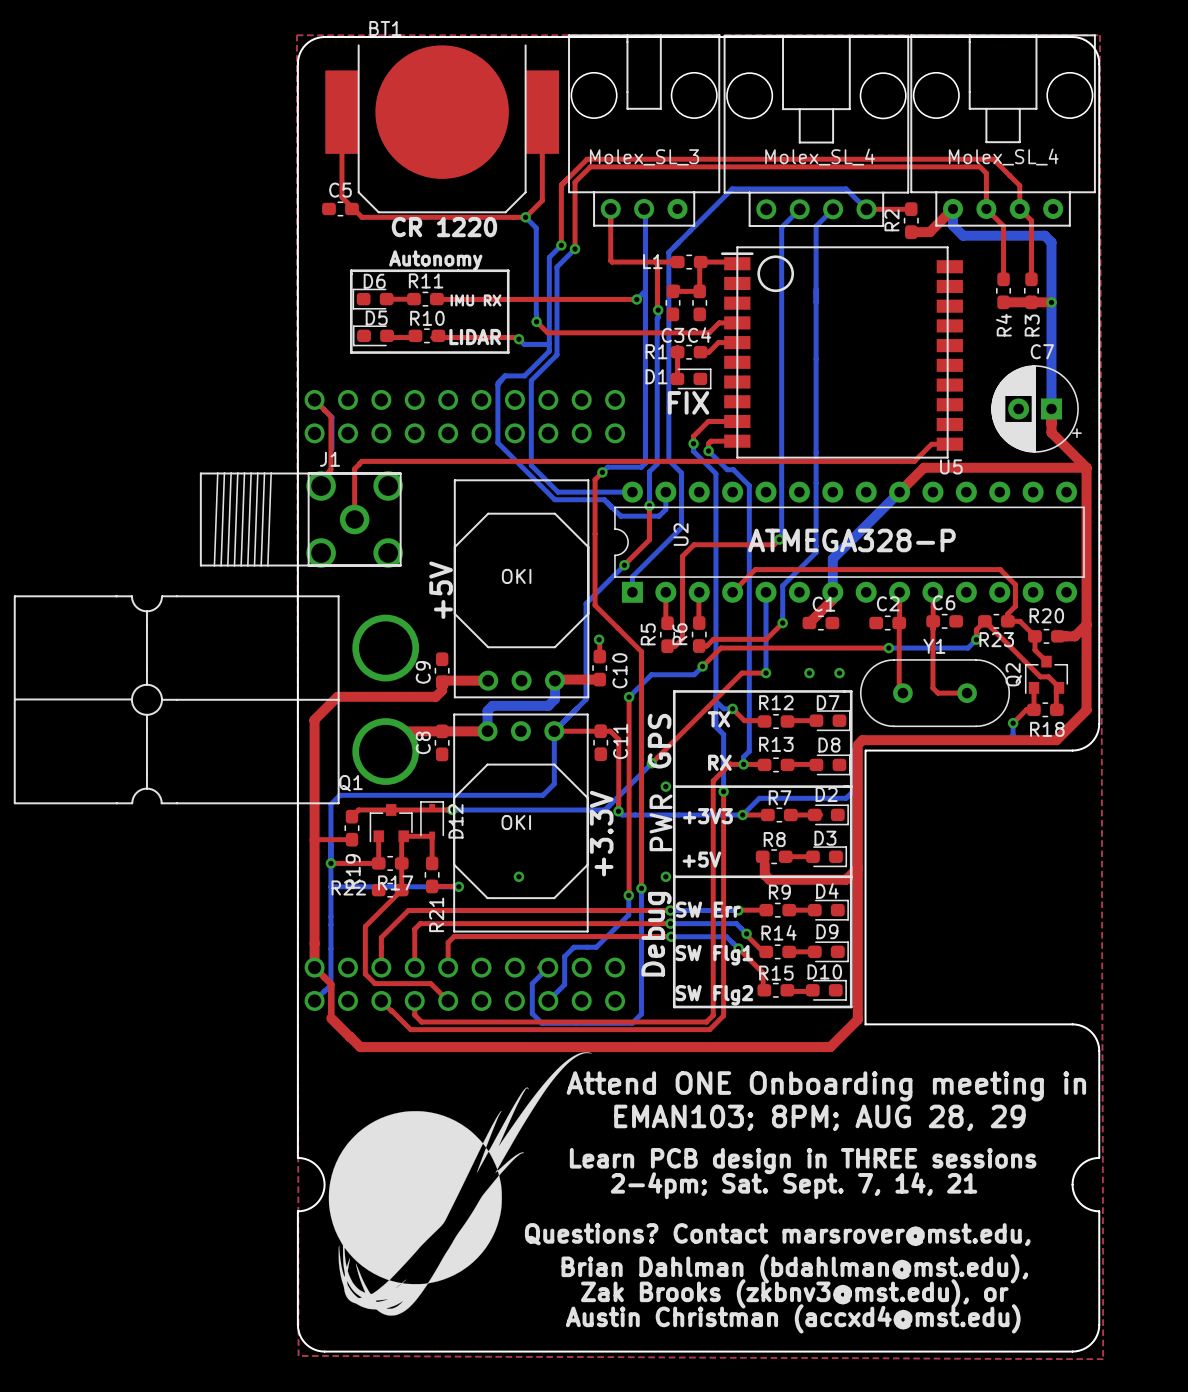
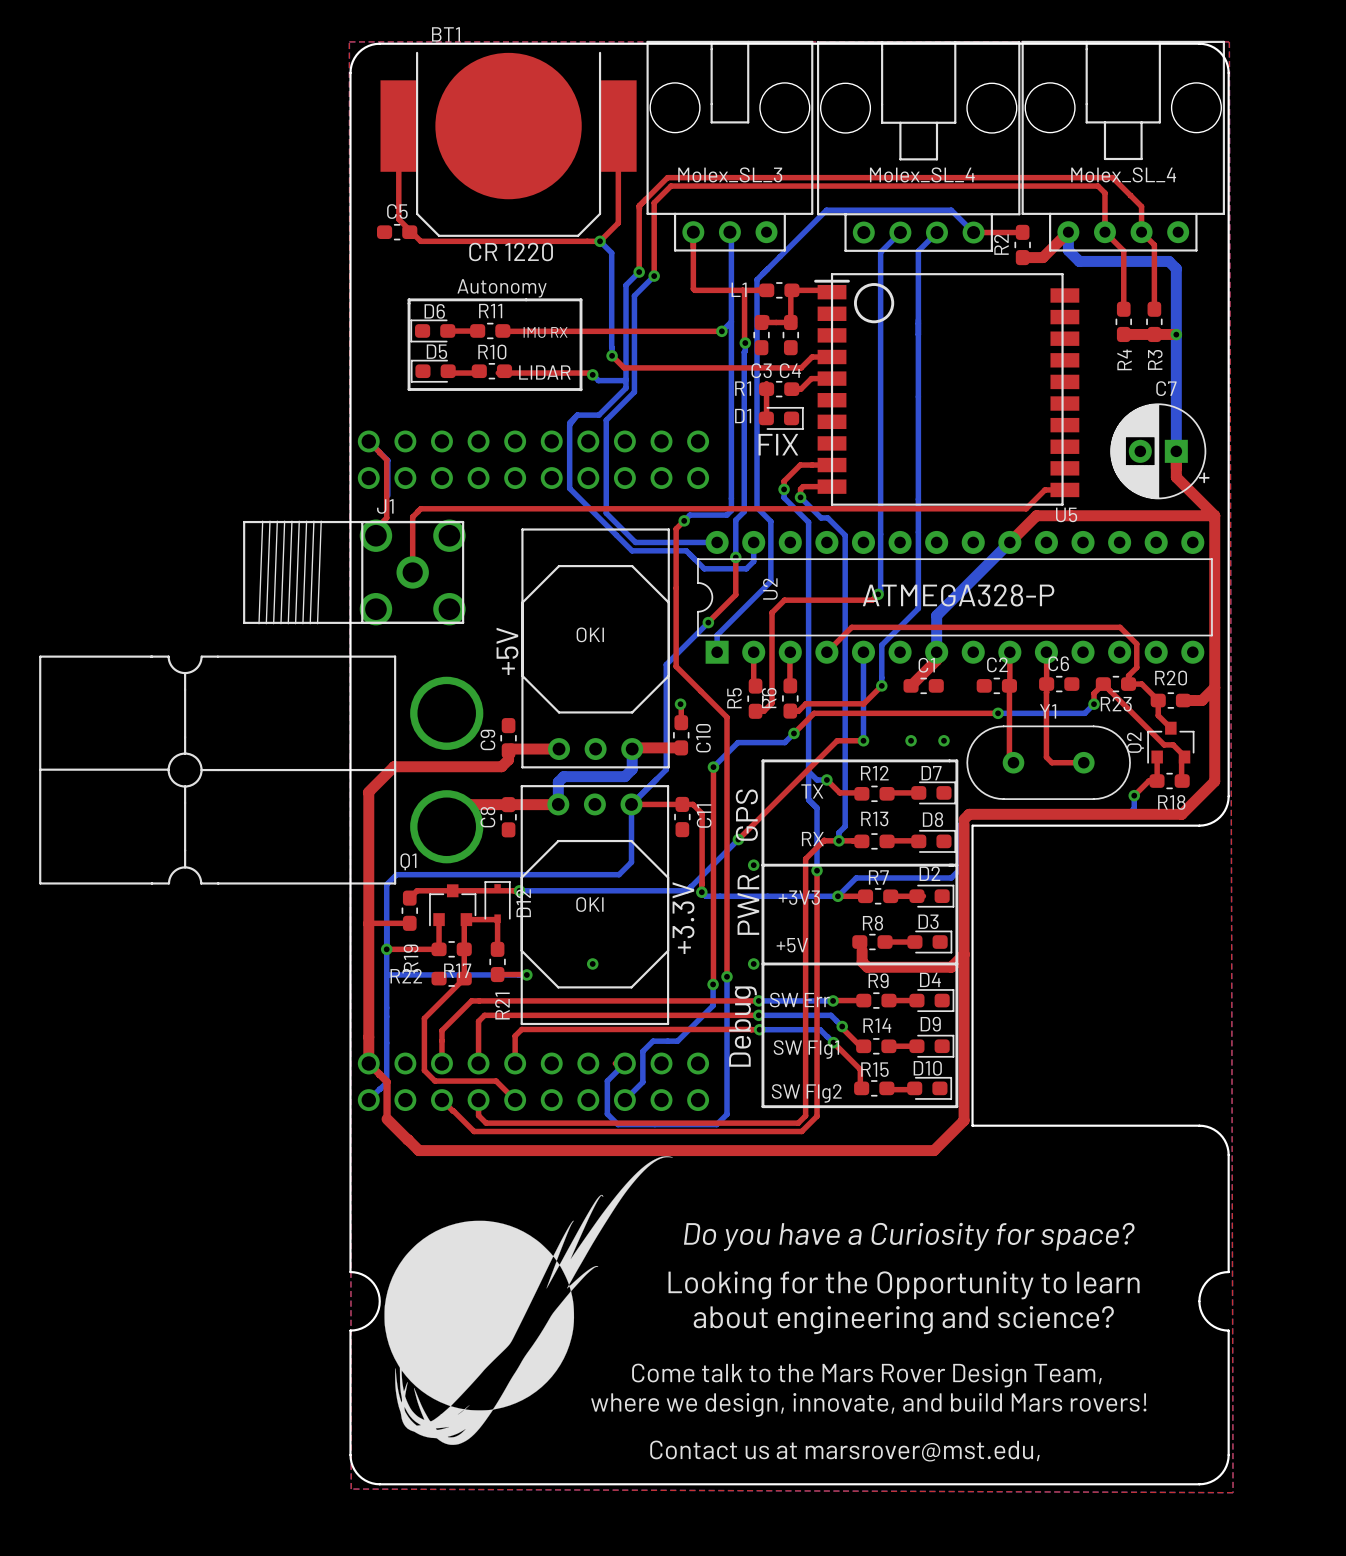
text: Attend ONE Onboarding meeting in (826, 1086) -> none
text: EMAN103; 8PM; AUG 28, 29 (819, 1117) -> none
text: none -> Do you have a Curiosity for space? (909, 1236)
text: Learn PCB design in THREE sessions (803, 1161) -> none
text: none -> Looking for the Opportunity to learn (904, 1285)
text: 2-4pm; Sat. Sept. 7, 14, 21 (794, 1185) -> none
text: none -> about engineering and science? (903, 1320)
text: Questions? Contact marsrover@mst.edu, (777, 1234) -> none
text: none -> Come talk to the Mars Rover Design Team, (866, 1375)
text: Brian Dahlman (bdahlman@mst.edu), (794, 1268) -> none
text: none -> where we design, innovate, and build Mars rovers! (868, 1404)
text: Zak Brooks (zkbnv3@mst.edu), or (794, 1293) -> none
text: Austin Christman (accxd4@mst.edu) (793, 1318) -> none
text: none -> Contact us at marsrover@mst.edu, (844, 1451)

